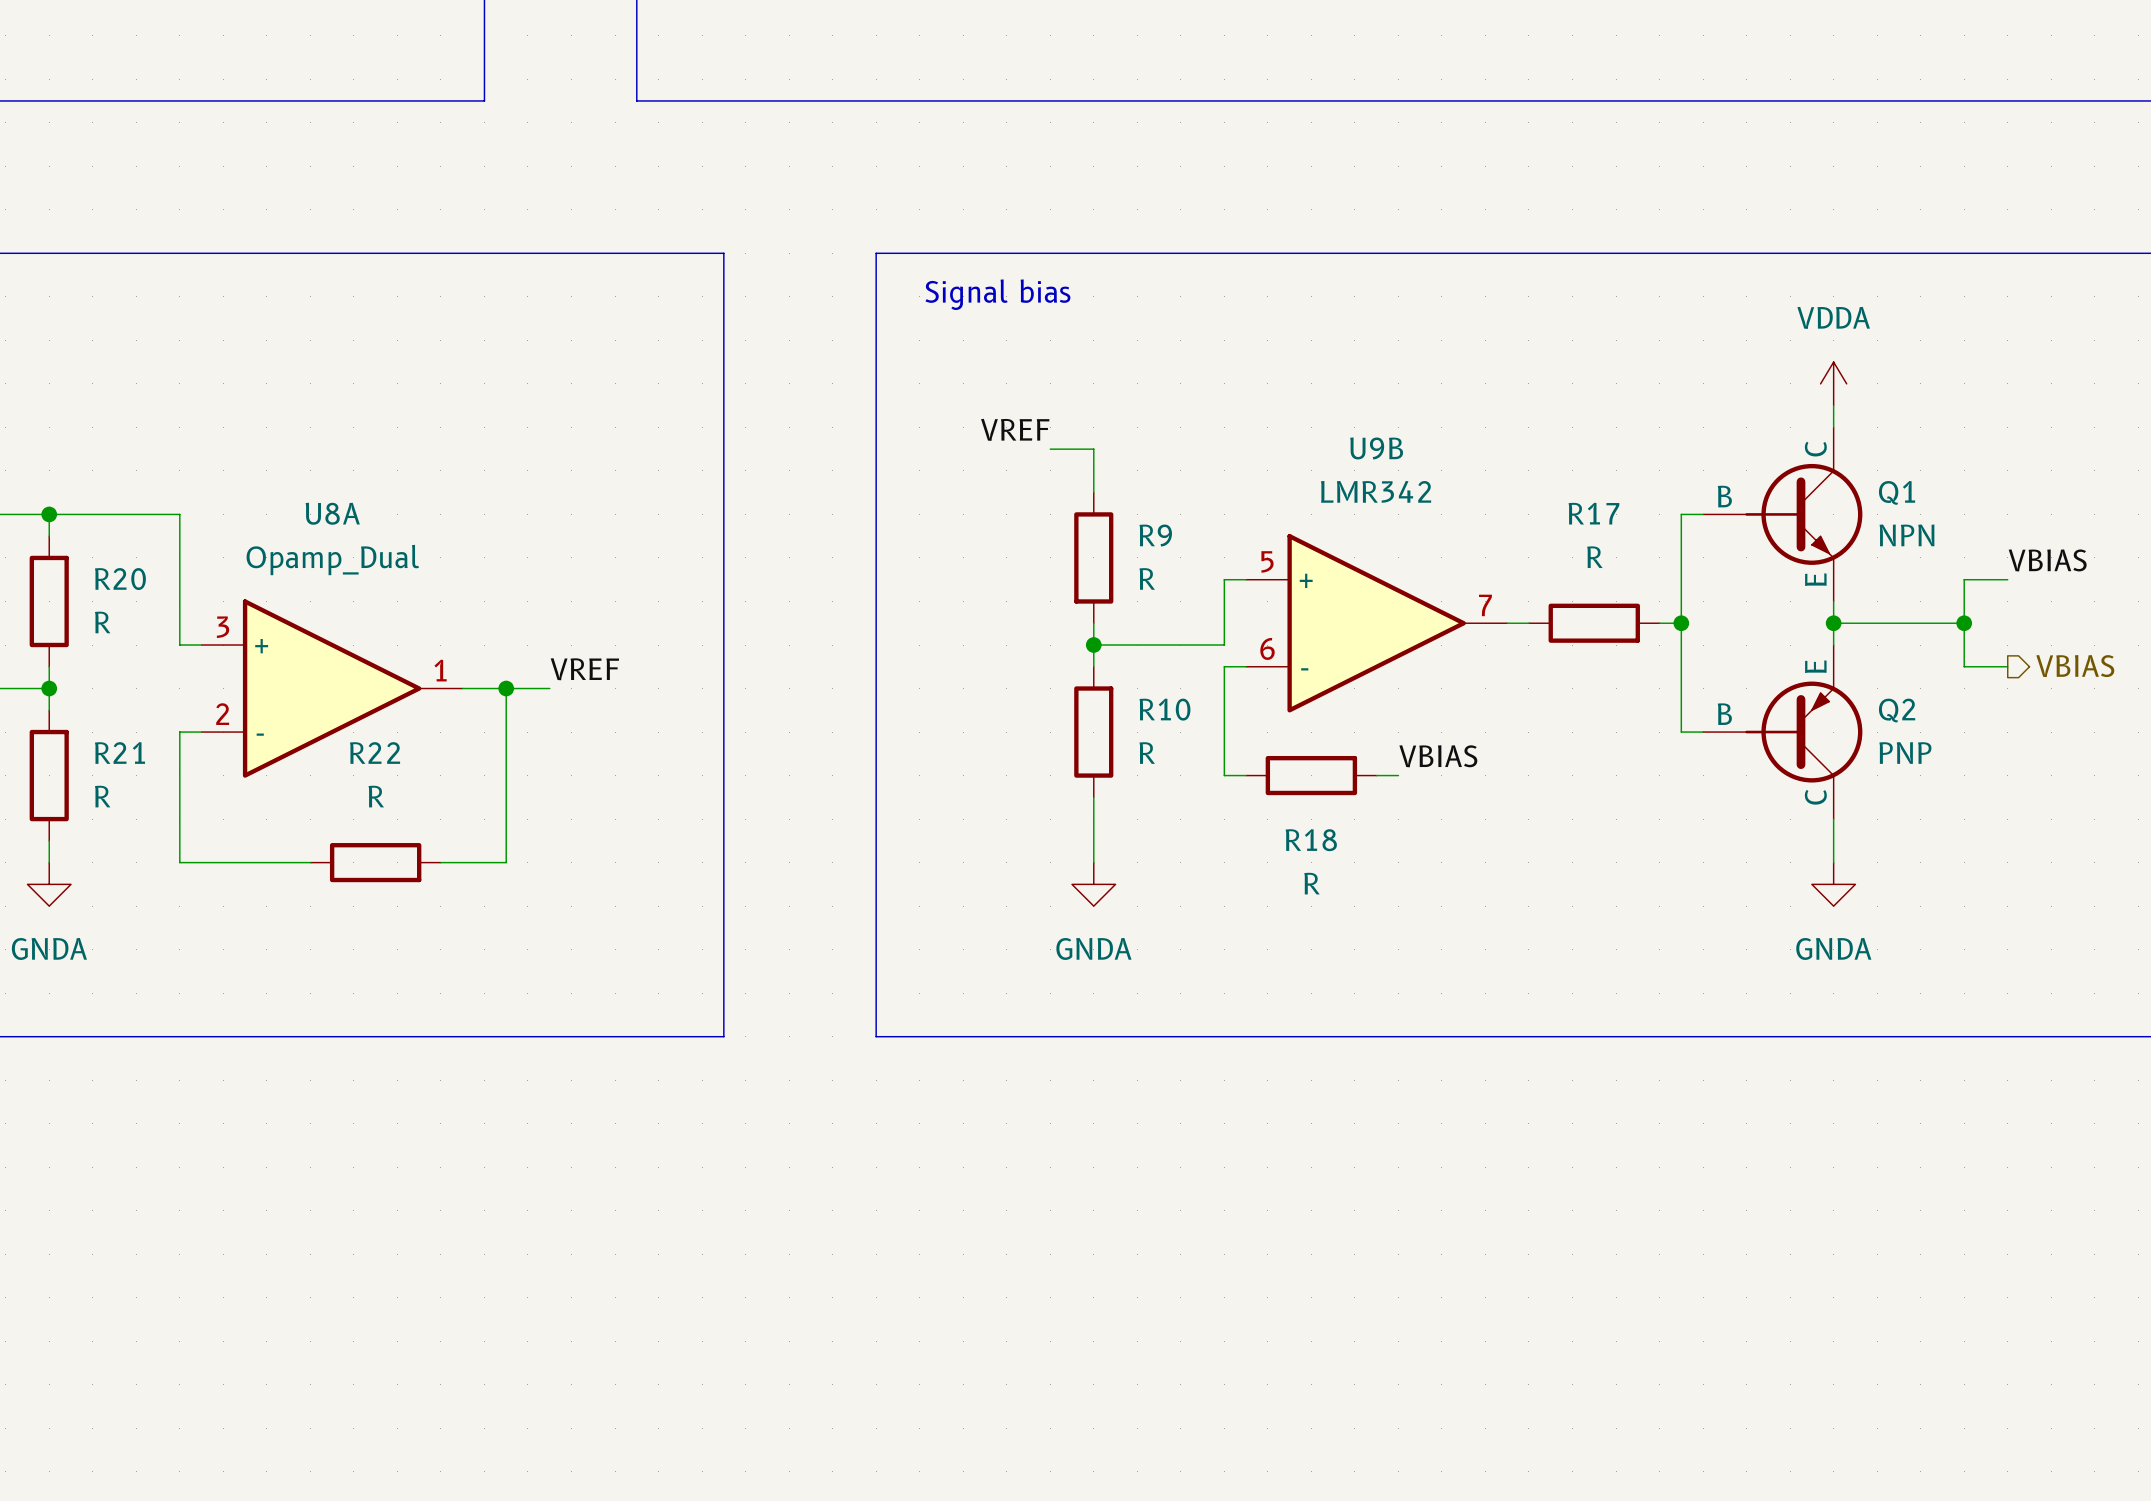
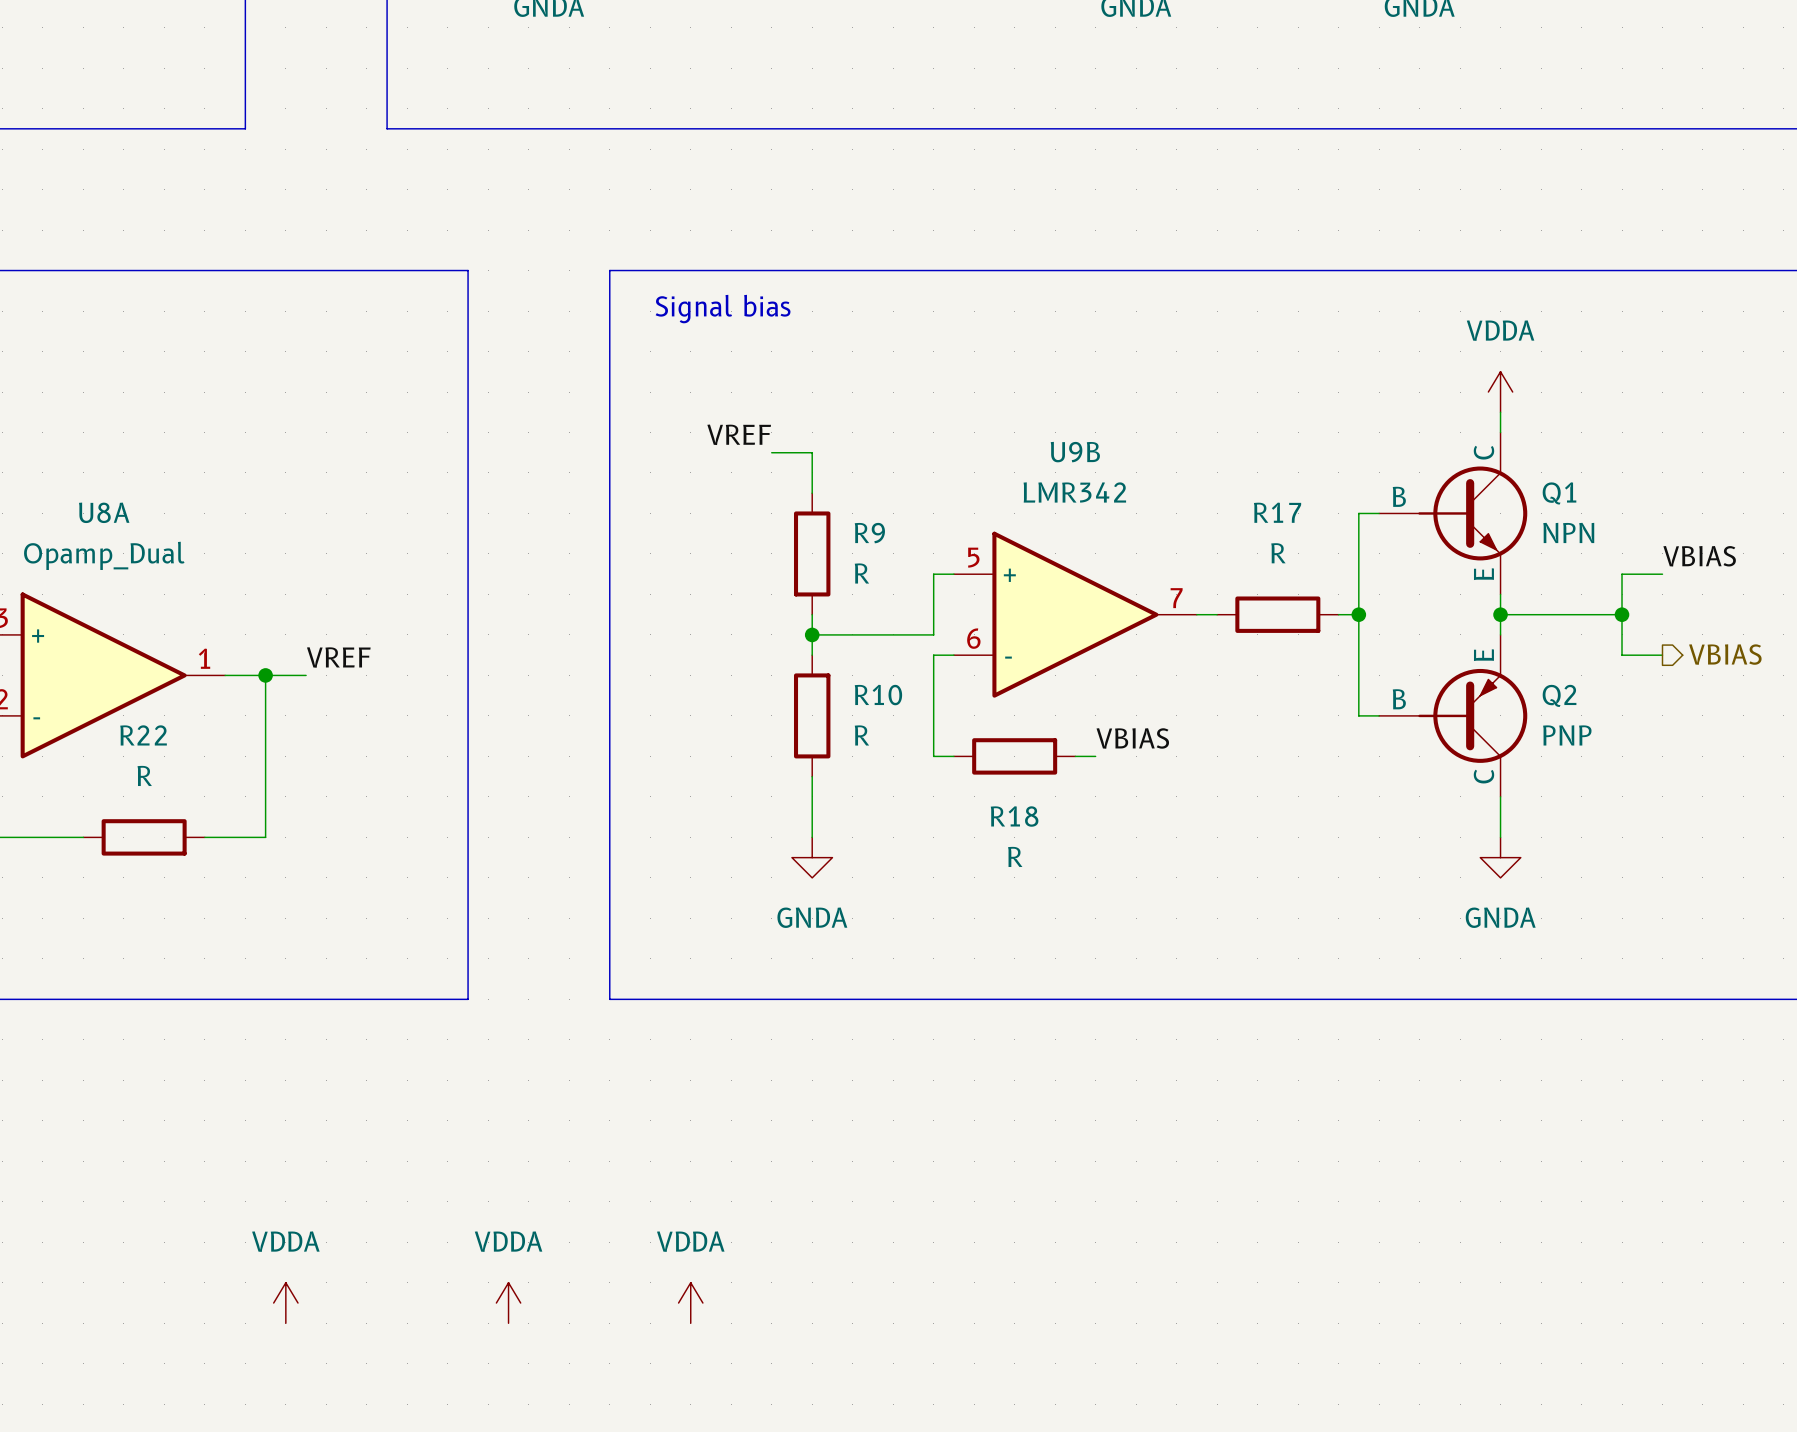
power symbol: none -> VDDA (285, 1303)
power symbol: none -> VDDA (508, 1303)
power symbol: none -> VDDA (690, 1303)

